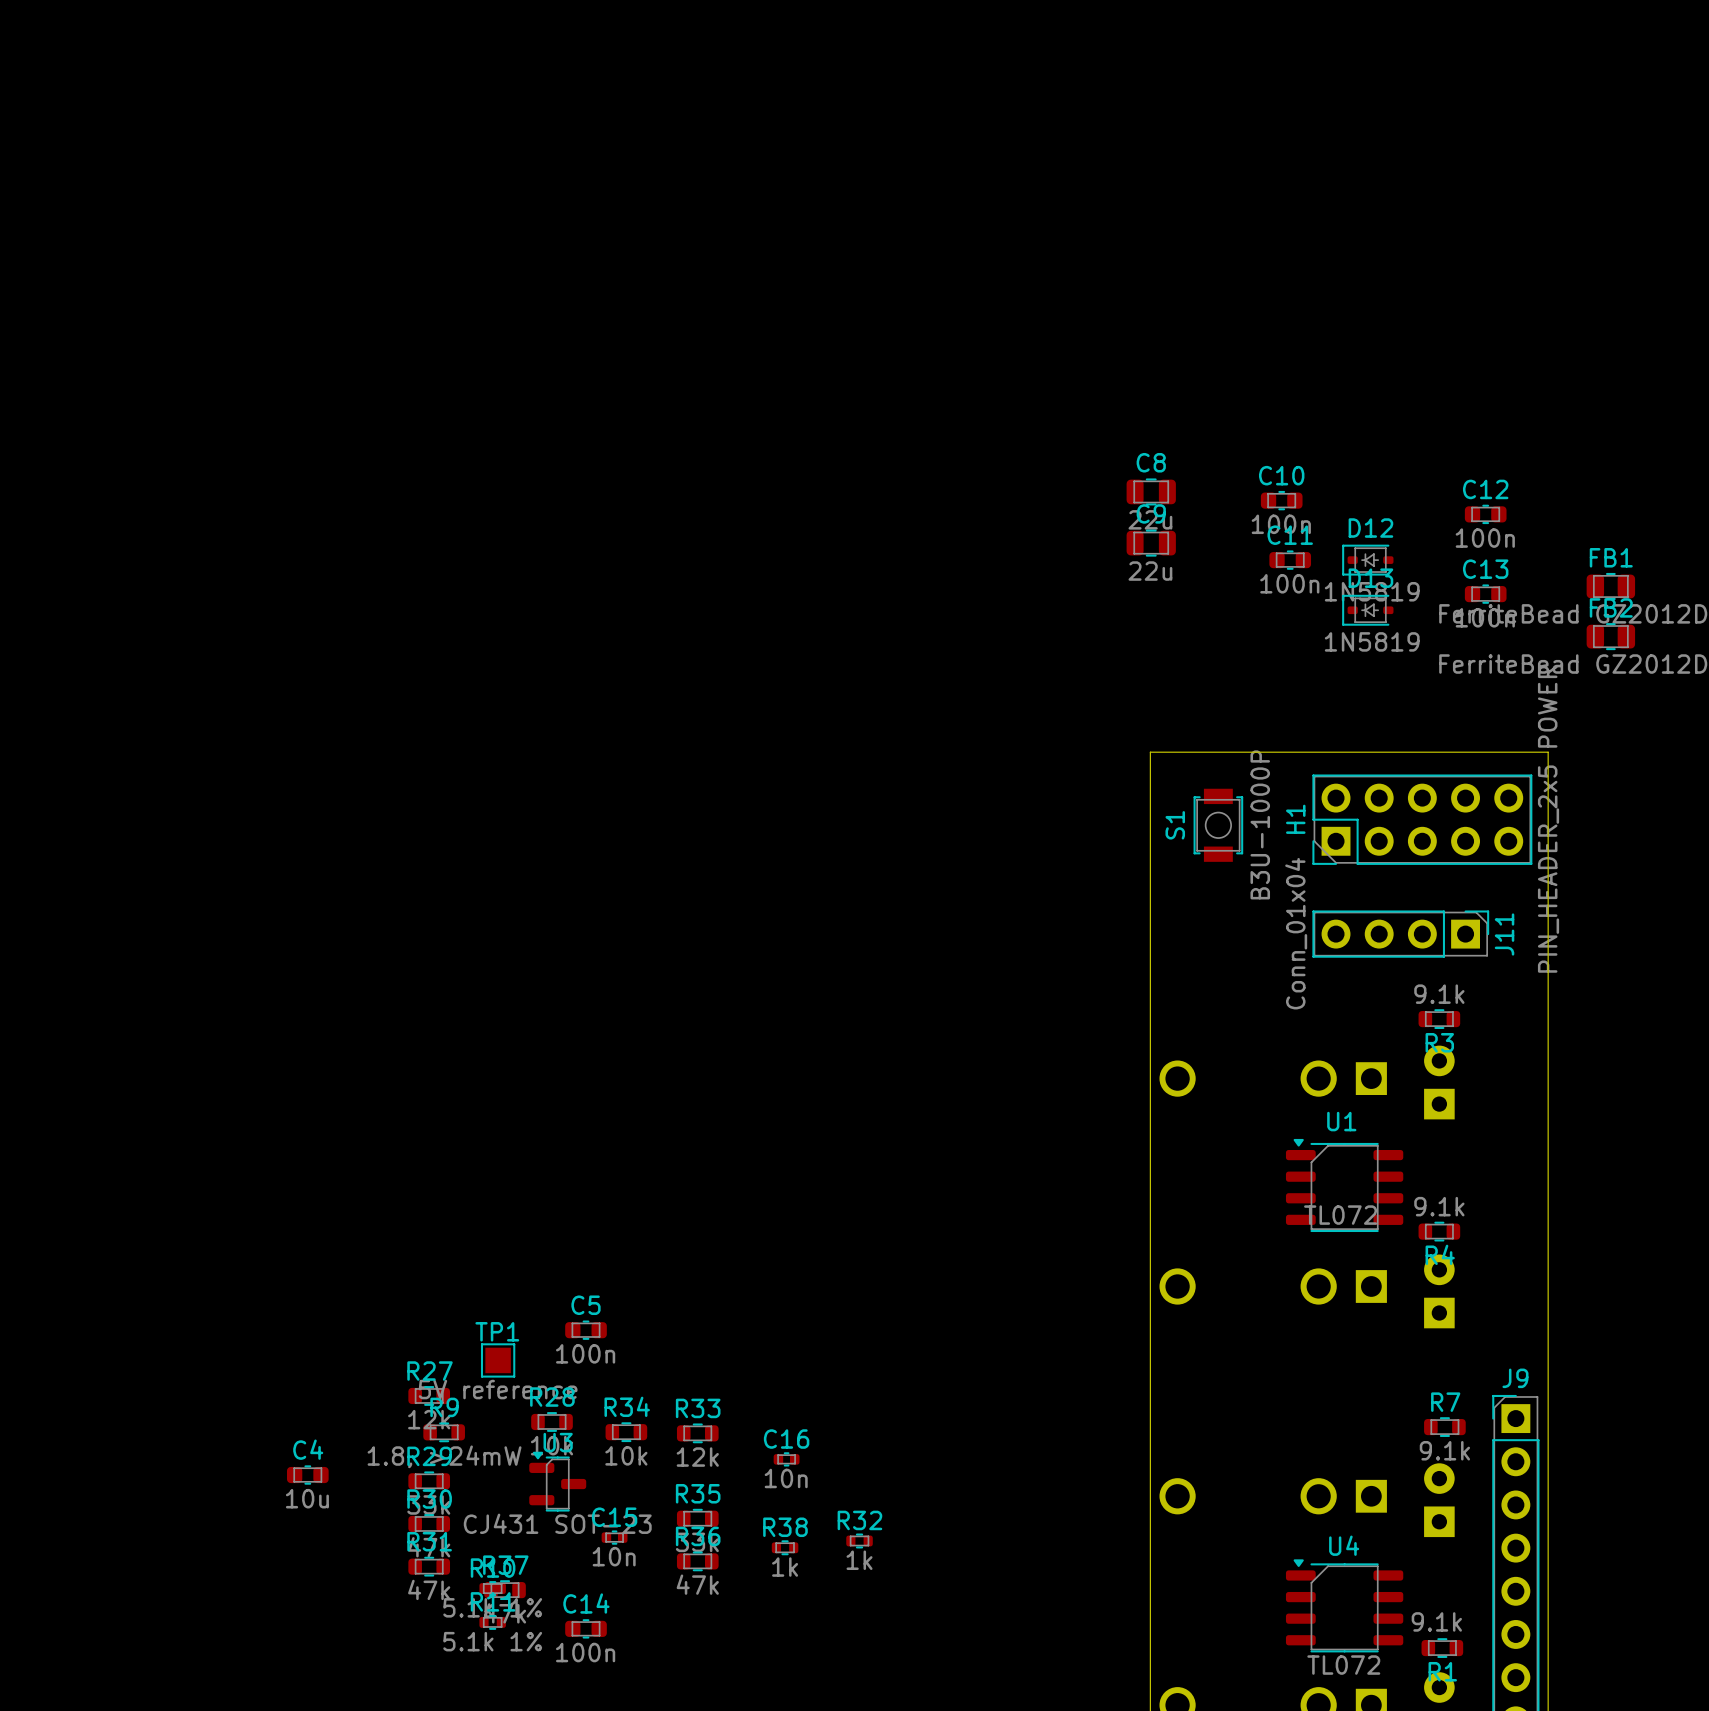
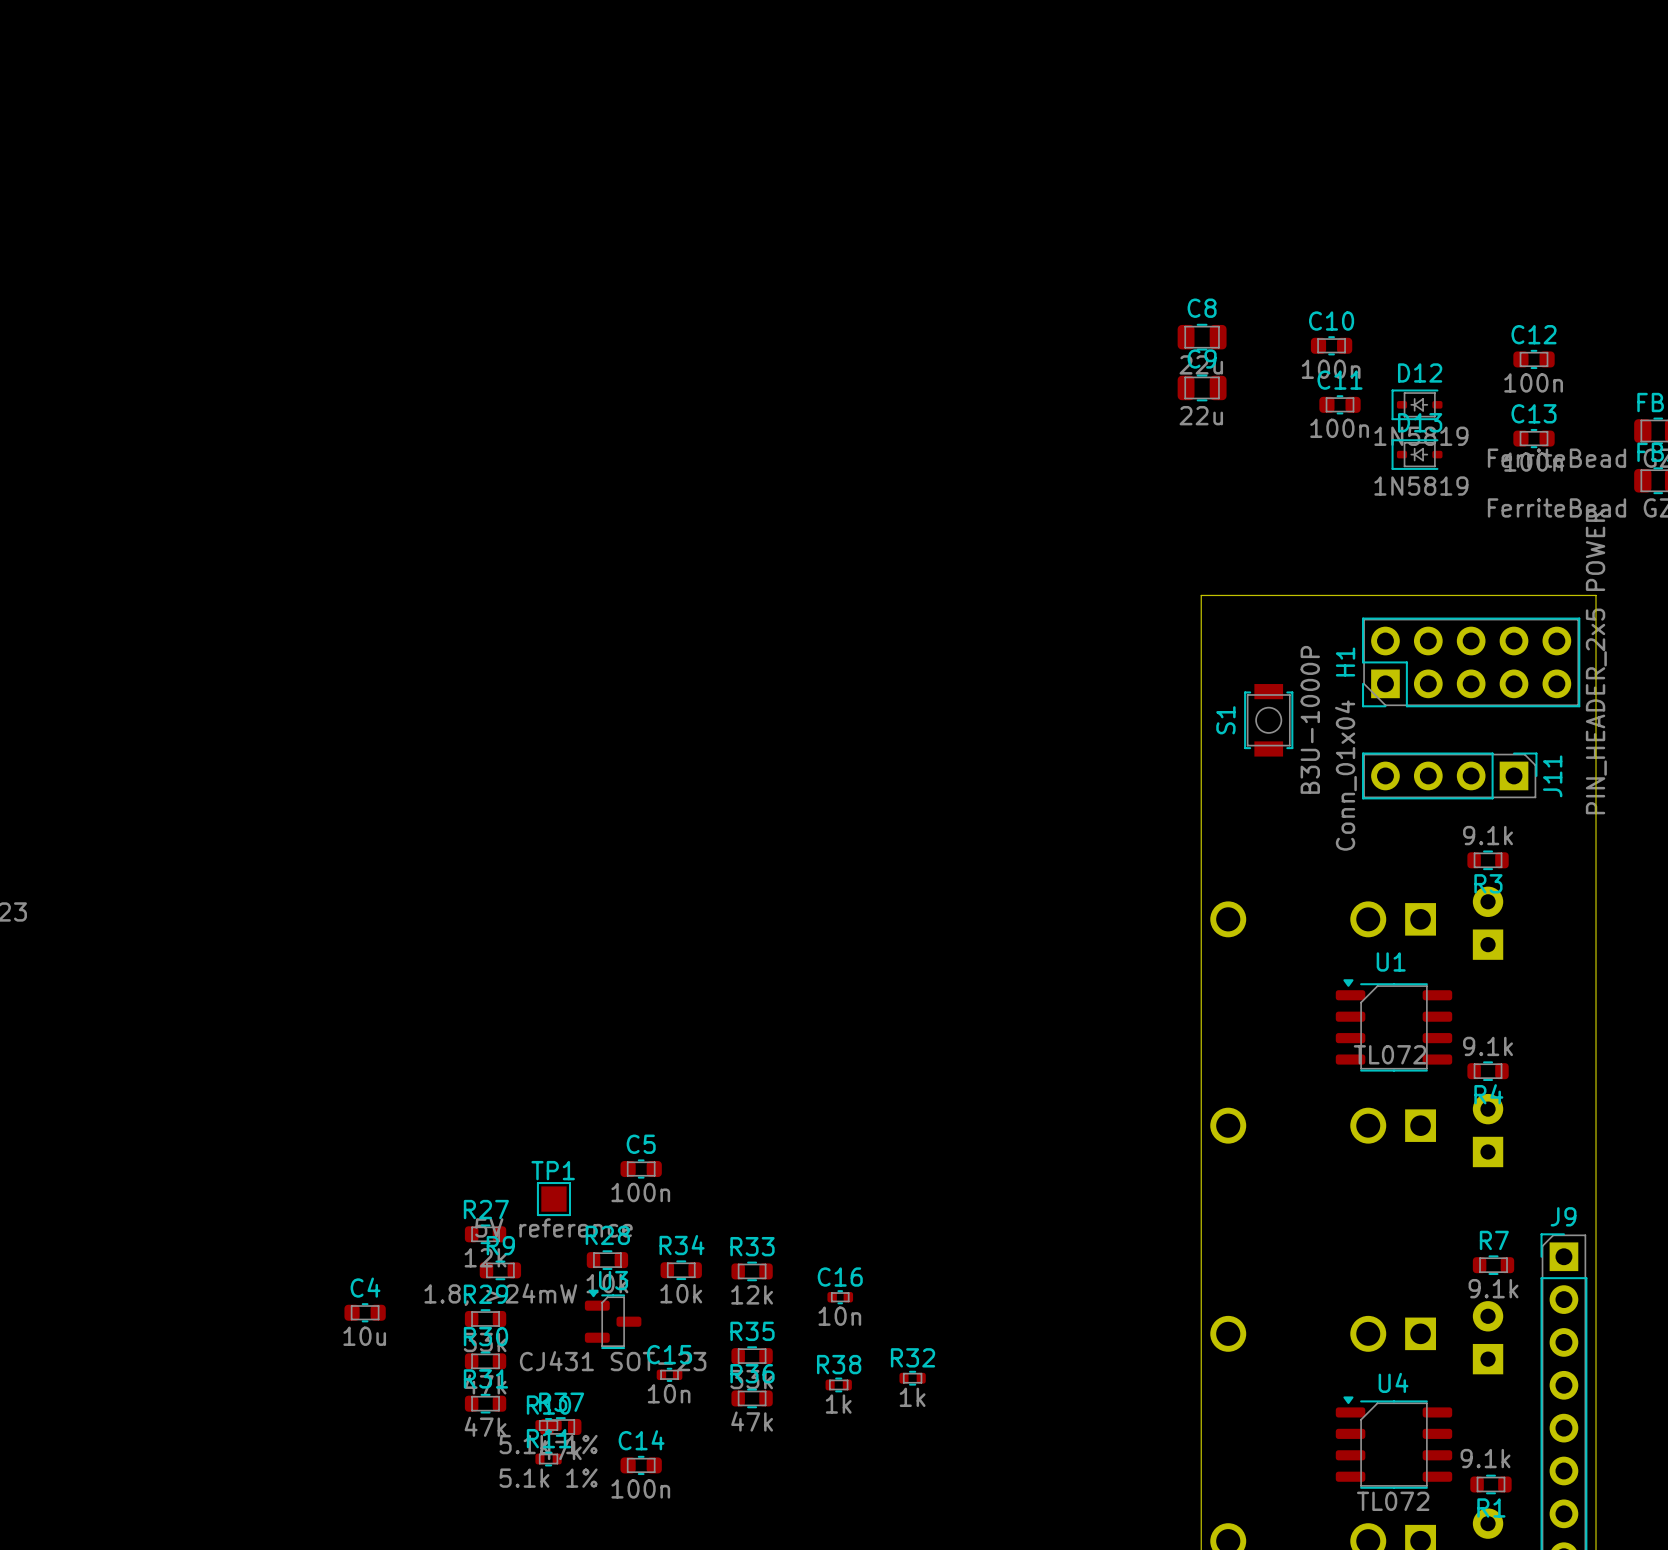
S1 position: (1218, 825) -> (1268, 720)

